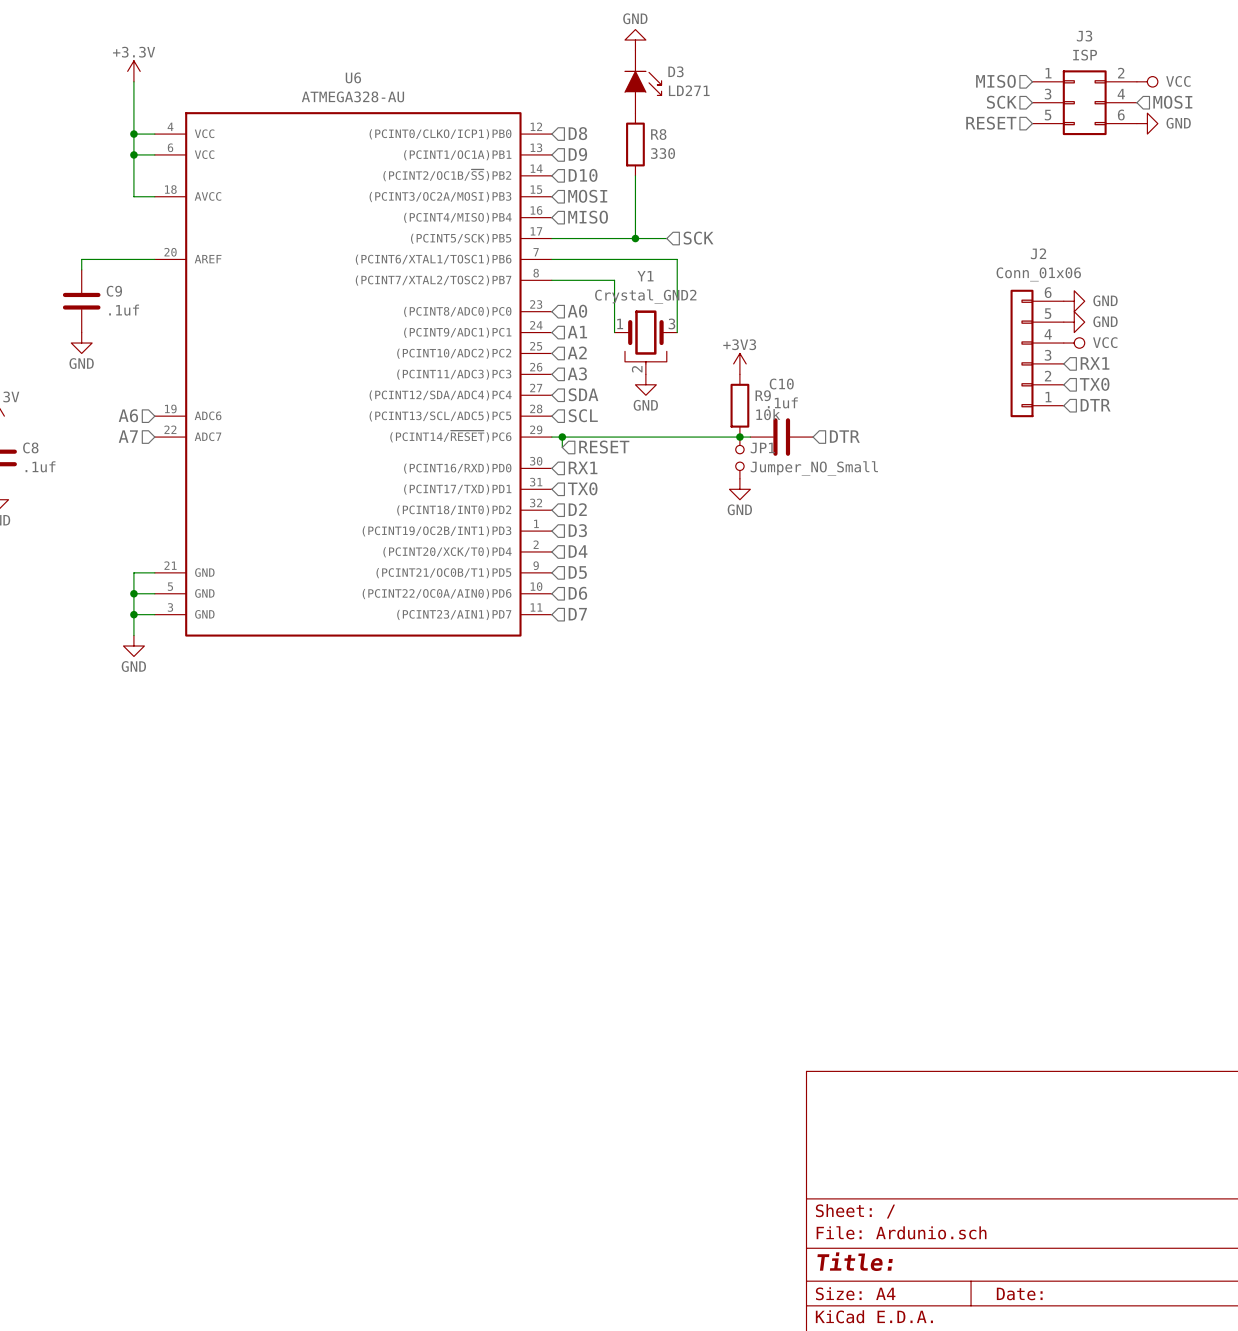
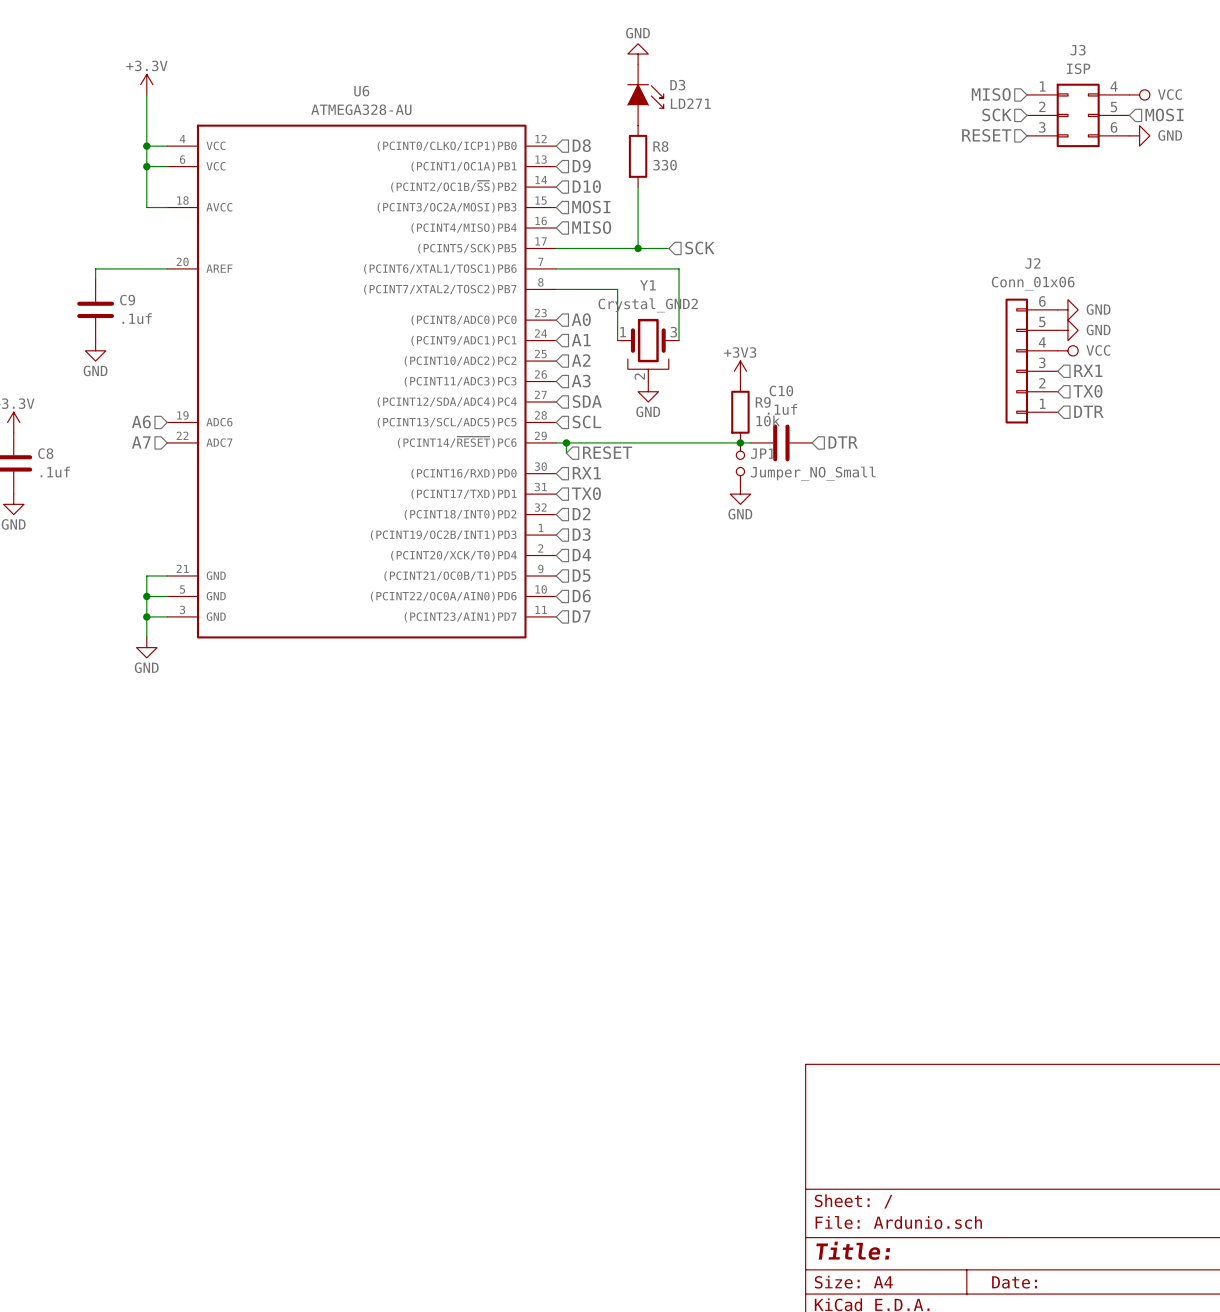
J3 pin number: 2 (1121, 73) -> 4 (1114, 86)
J3 pin number: 3 (1048, 94) -> 2 (1042, 106)
J3 pin number: 4 (1121, 94) -> 5 (1113, 107)
J3 pin number: 5 (1048, 115) -> 3 (1042, 127)

